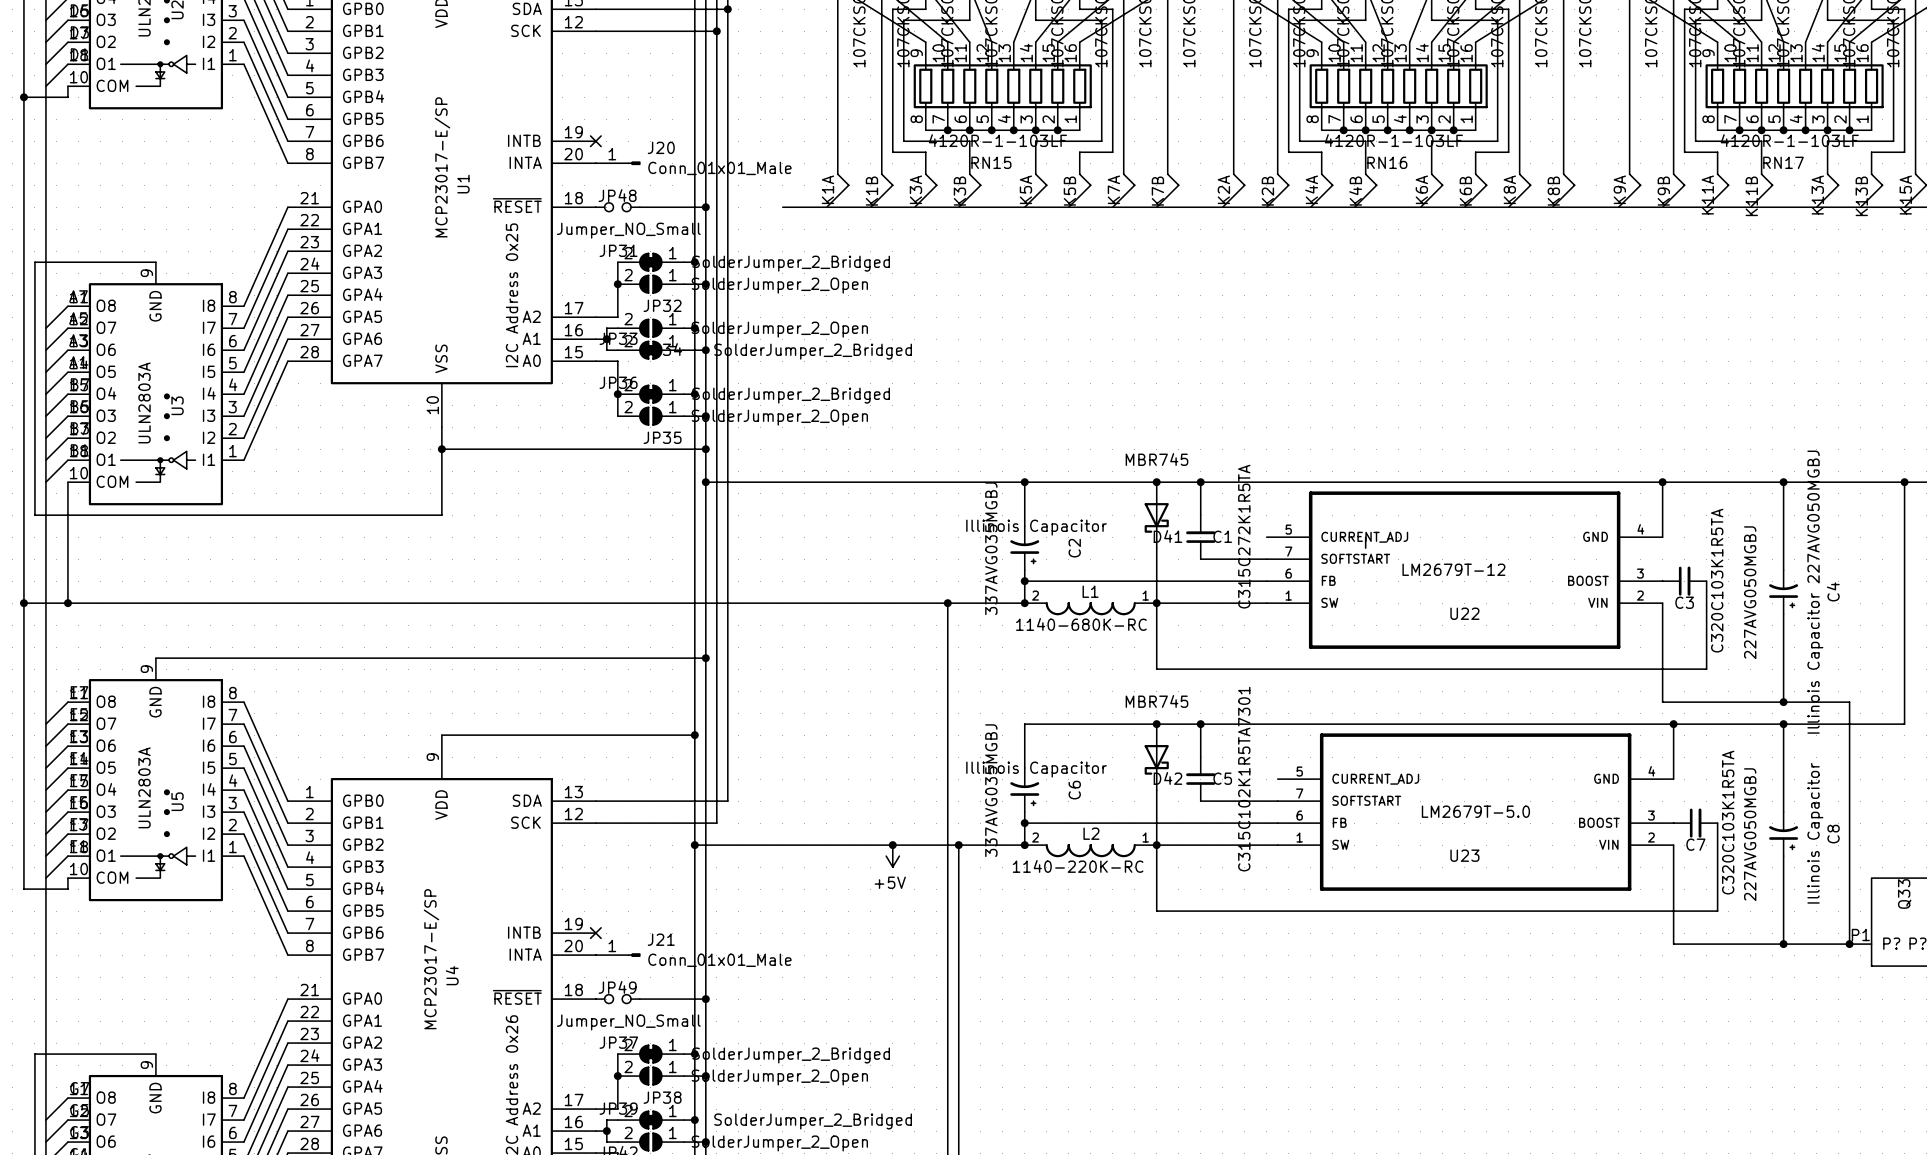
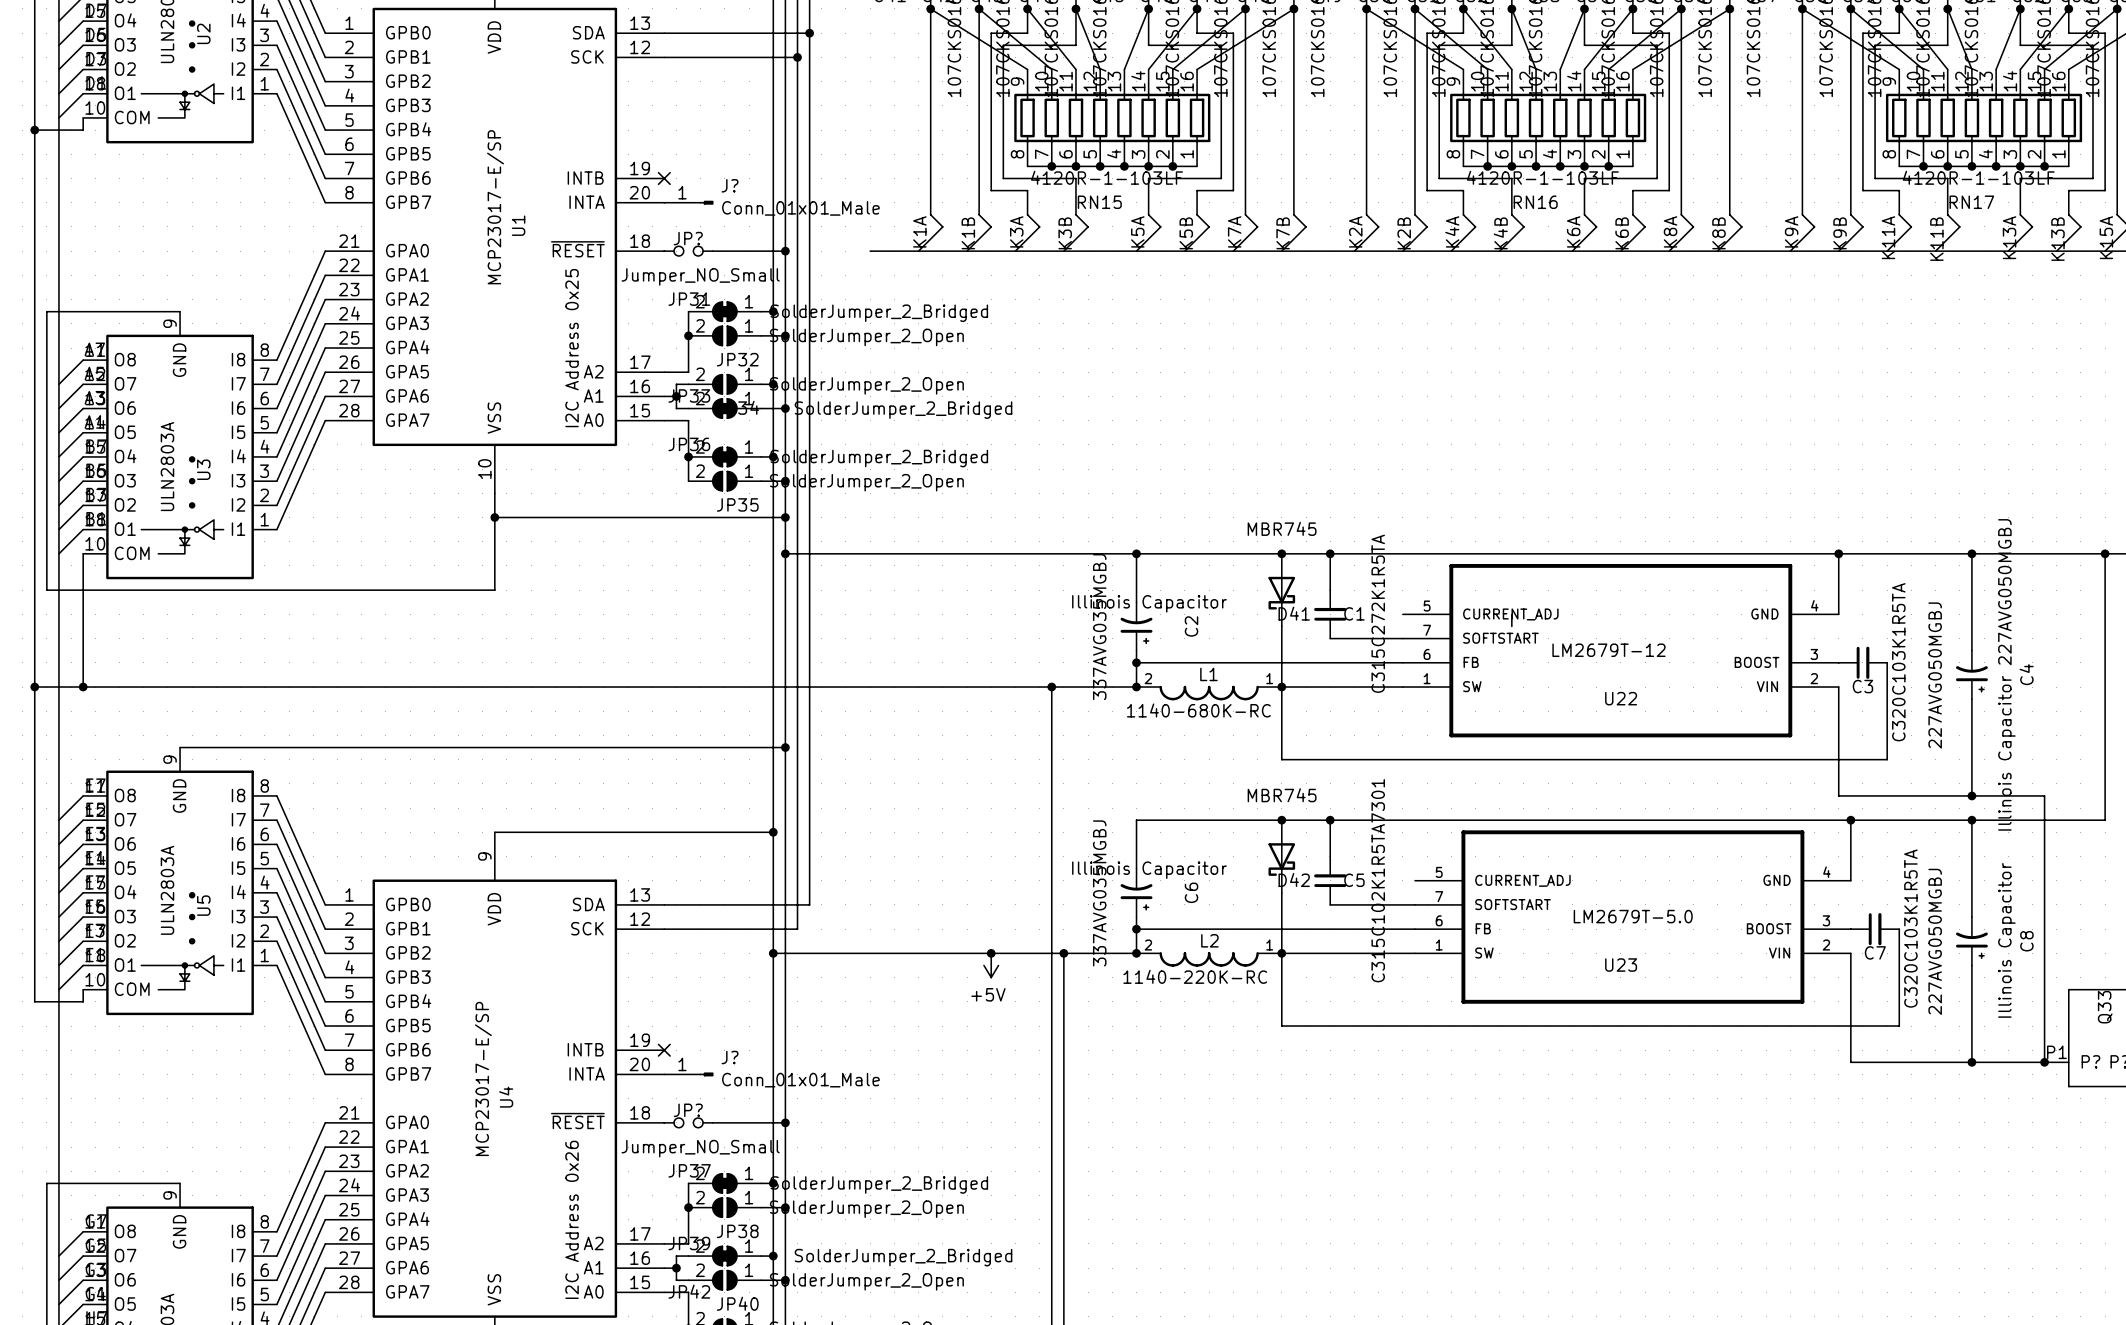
J20 name: J20 (661, 147) -> J? (730, 185)
JP48 name: JP48 (617, 195) -> JP? (688, 238)
J21 name: J21 (661, 939) -> J? (730, 1057)
JP49 name: JP49 (617, 987) -> JP? (688, 1110)

